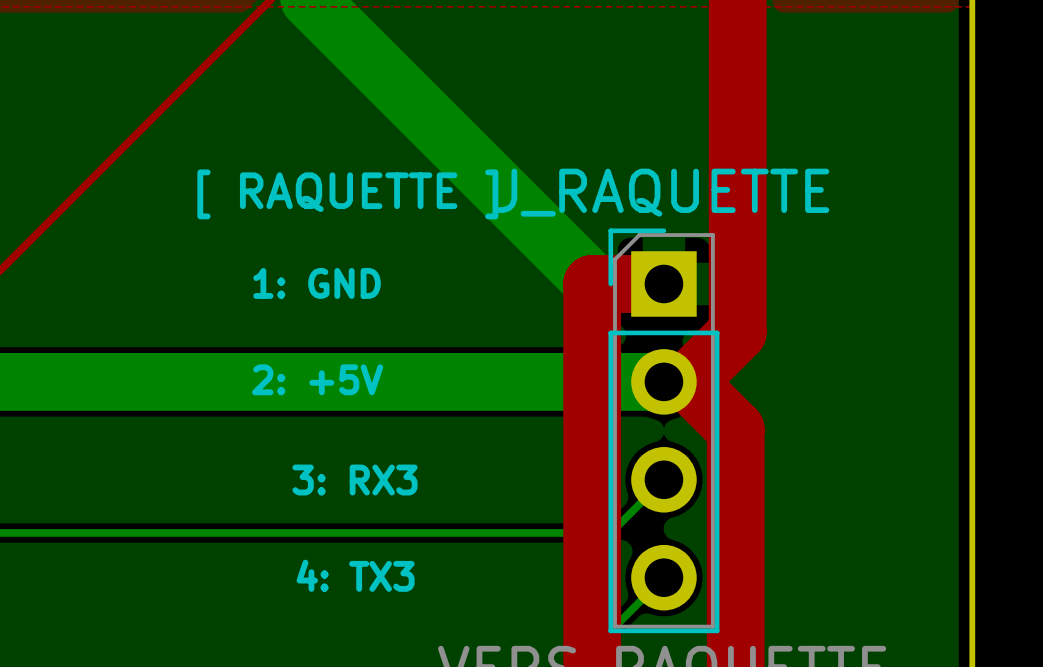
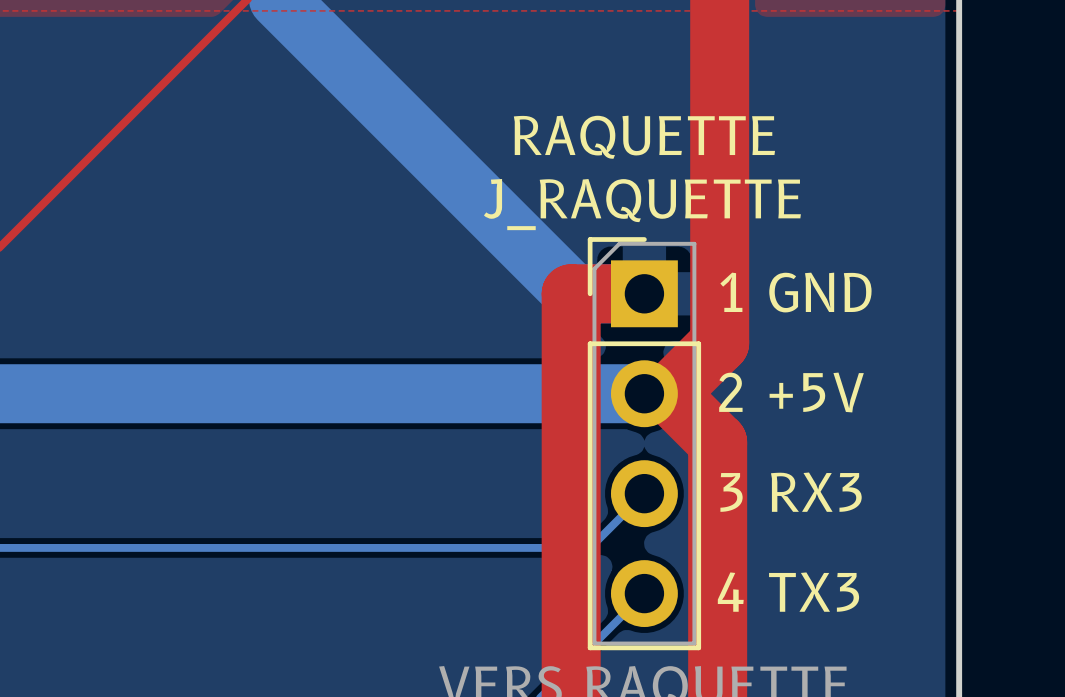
text: [ RAQUETTE ] (347, 194) -> RAQUETTE (644, 137)
text: none -> 1 GND (795, 292)
text: 1: GND (317, 283) -> none
text: 2: +5V (317, 379) -> none
text: none -> 2 +5V (791, 392)
text: none -> 3 RX3 (791, 492)
text: 3: RX3 (354, 480) -> none
text: 4: TX3 (355, 575) -> none
text: none -> 4 TX3 (788, 592)

